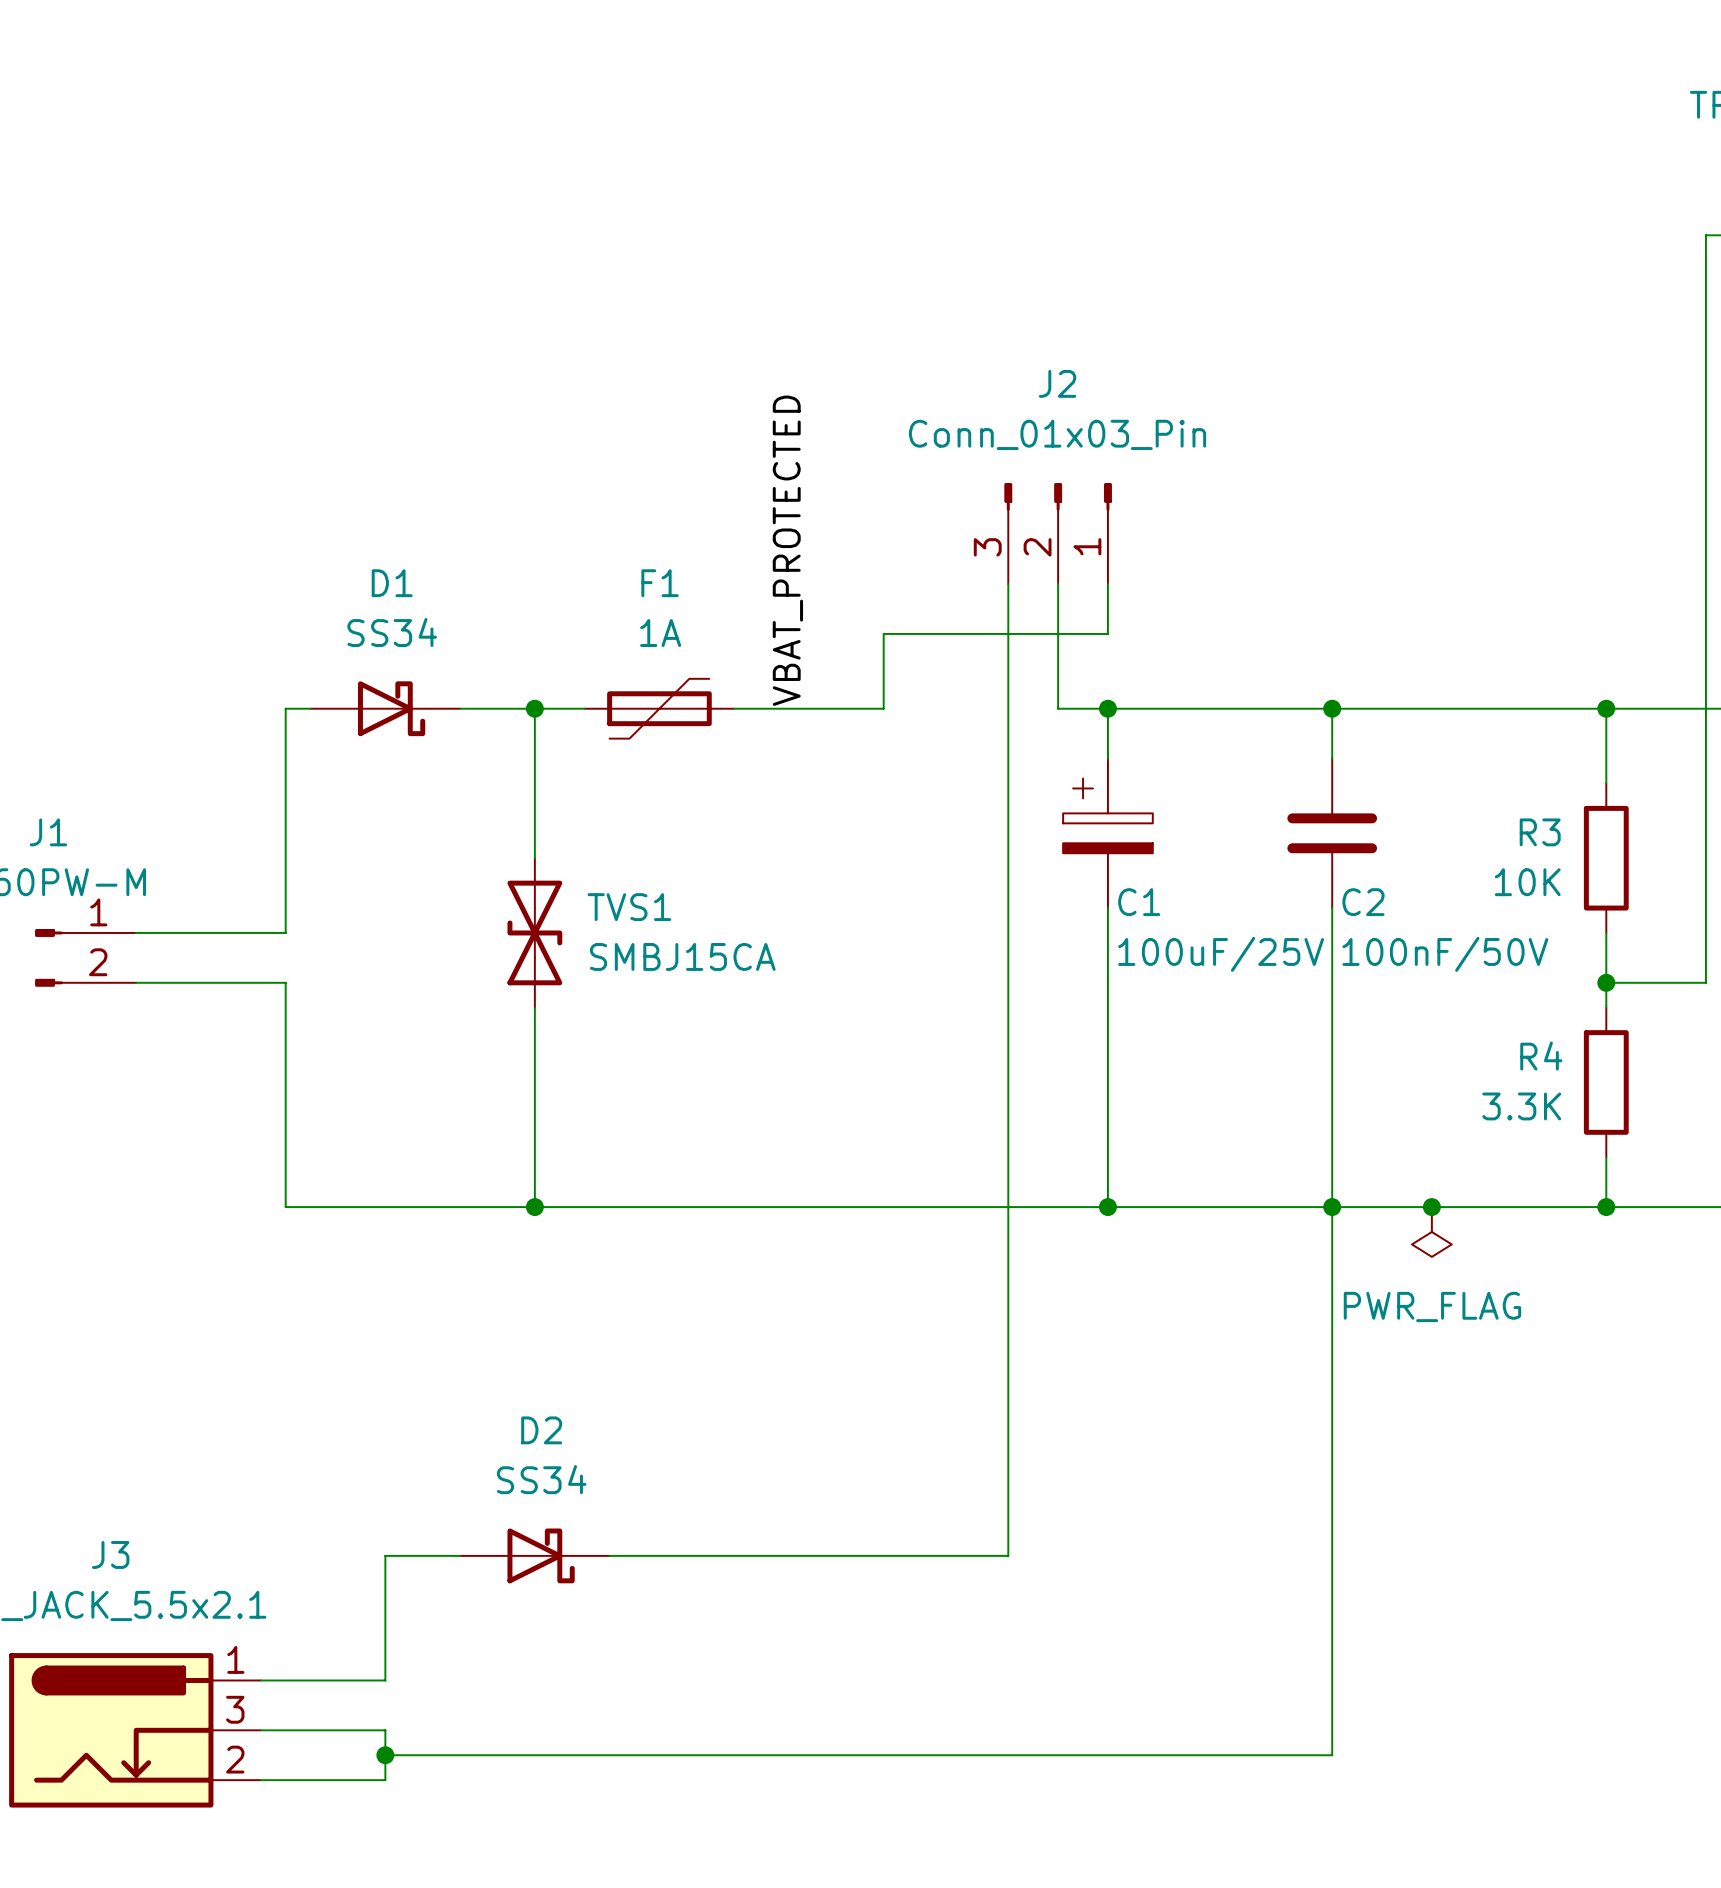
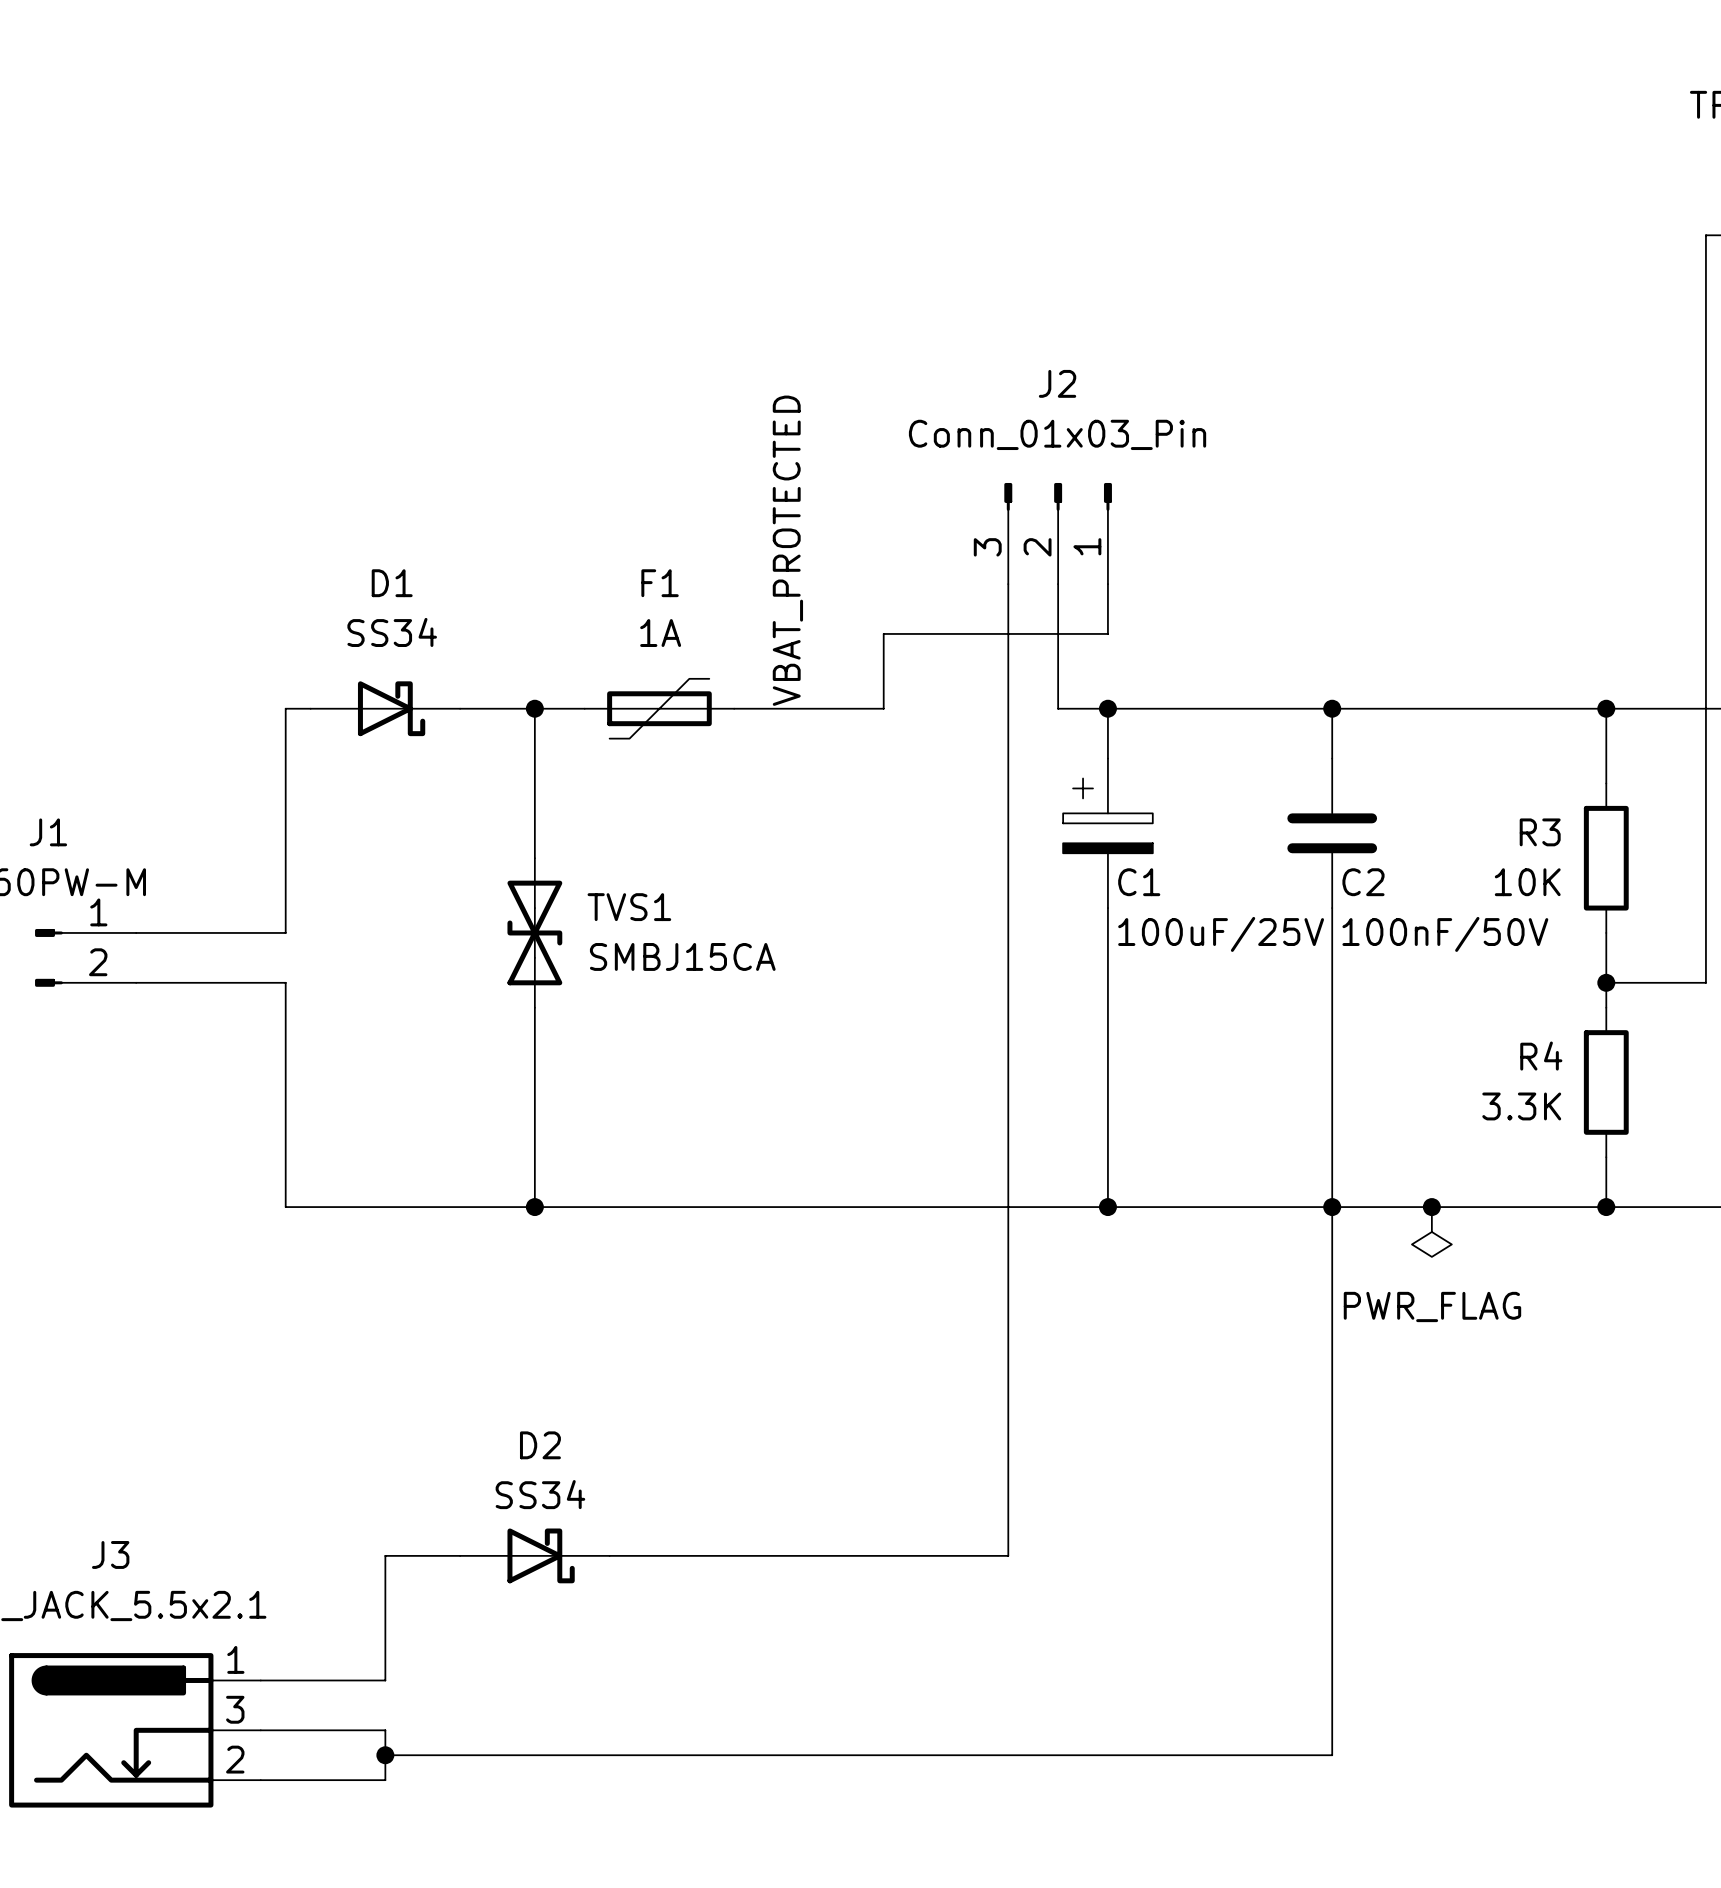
C1 name position: C1 (1139, 902) -> C1 (1139, 882)
C2 name position: C2 (1363, 902) -> C2 (1363, 882)
C1 value position: 100uF/25V (1221, 954) -> 100uF/25V (1221, 934)
C2 value position: 100nF/50V (1445, 954) -> 100nF/50V (1445, 934)
D2 name position: D2 (541, 1430) -> D2 (540, 1445)
D2 value position: SS34 (541, 1479) -> SS34 (540, 1494)

